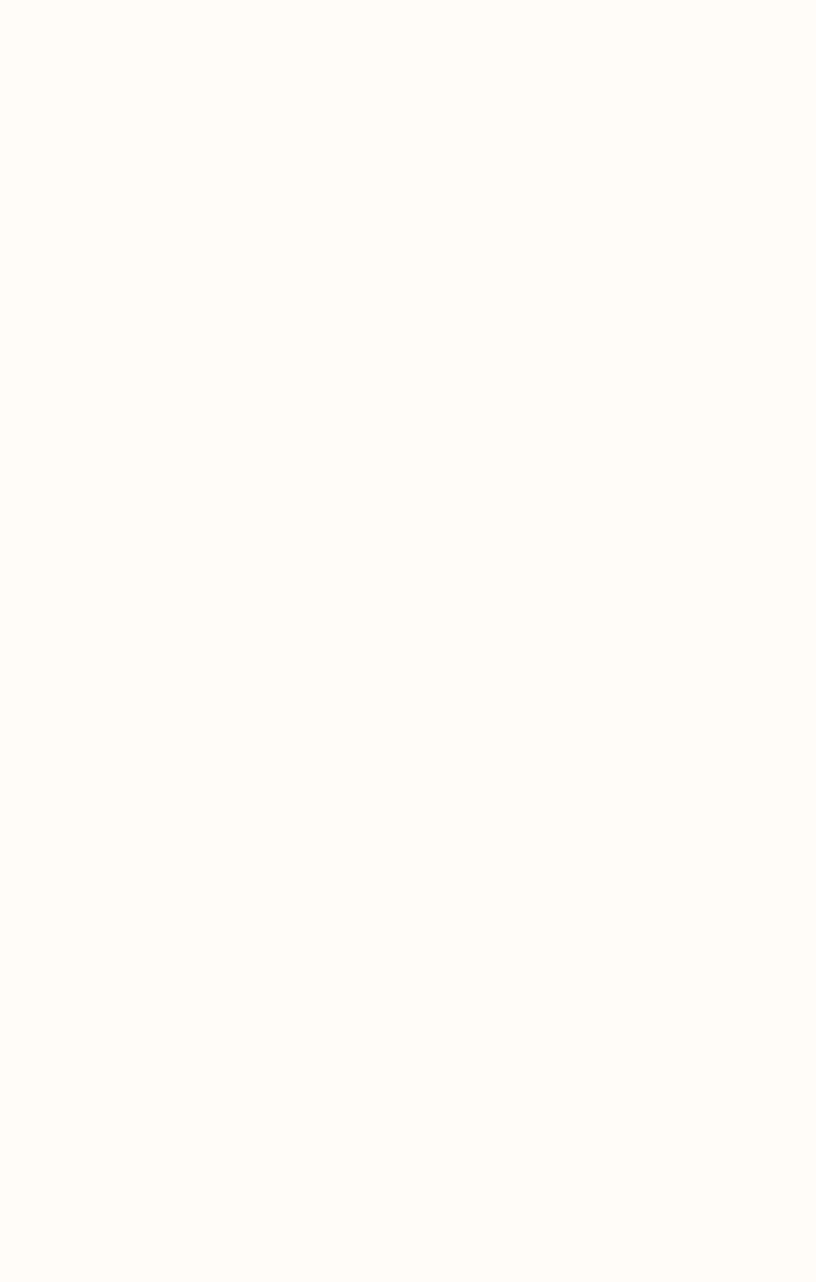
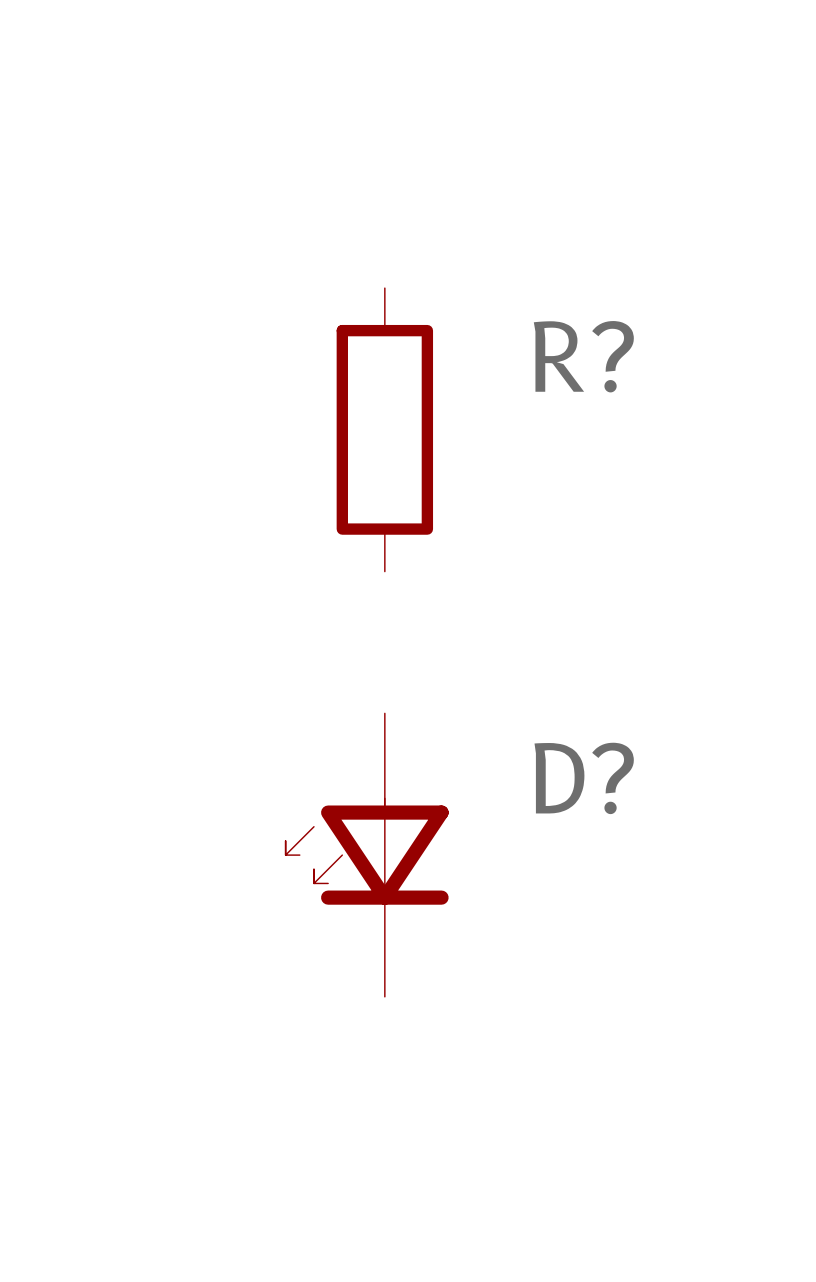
R?: none -> (384, 429)
D?: none -> (367, 855)

